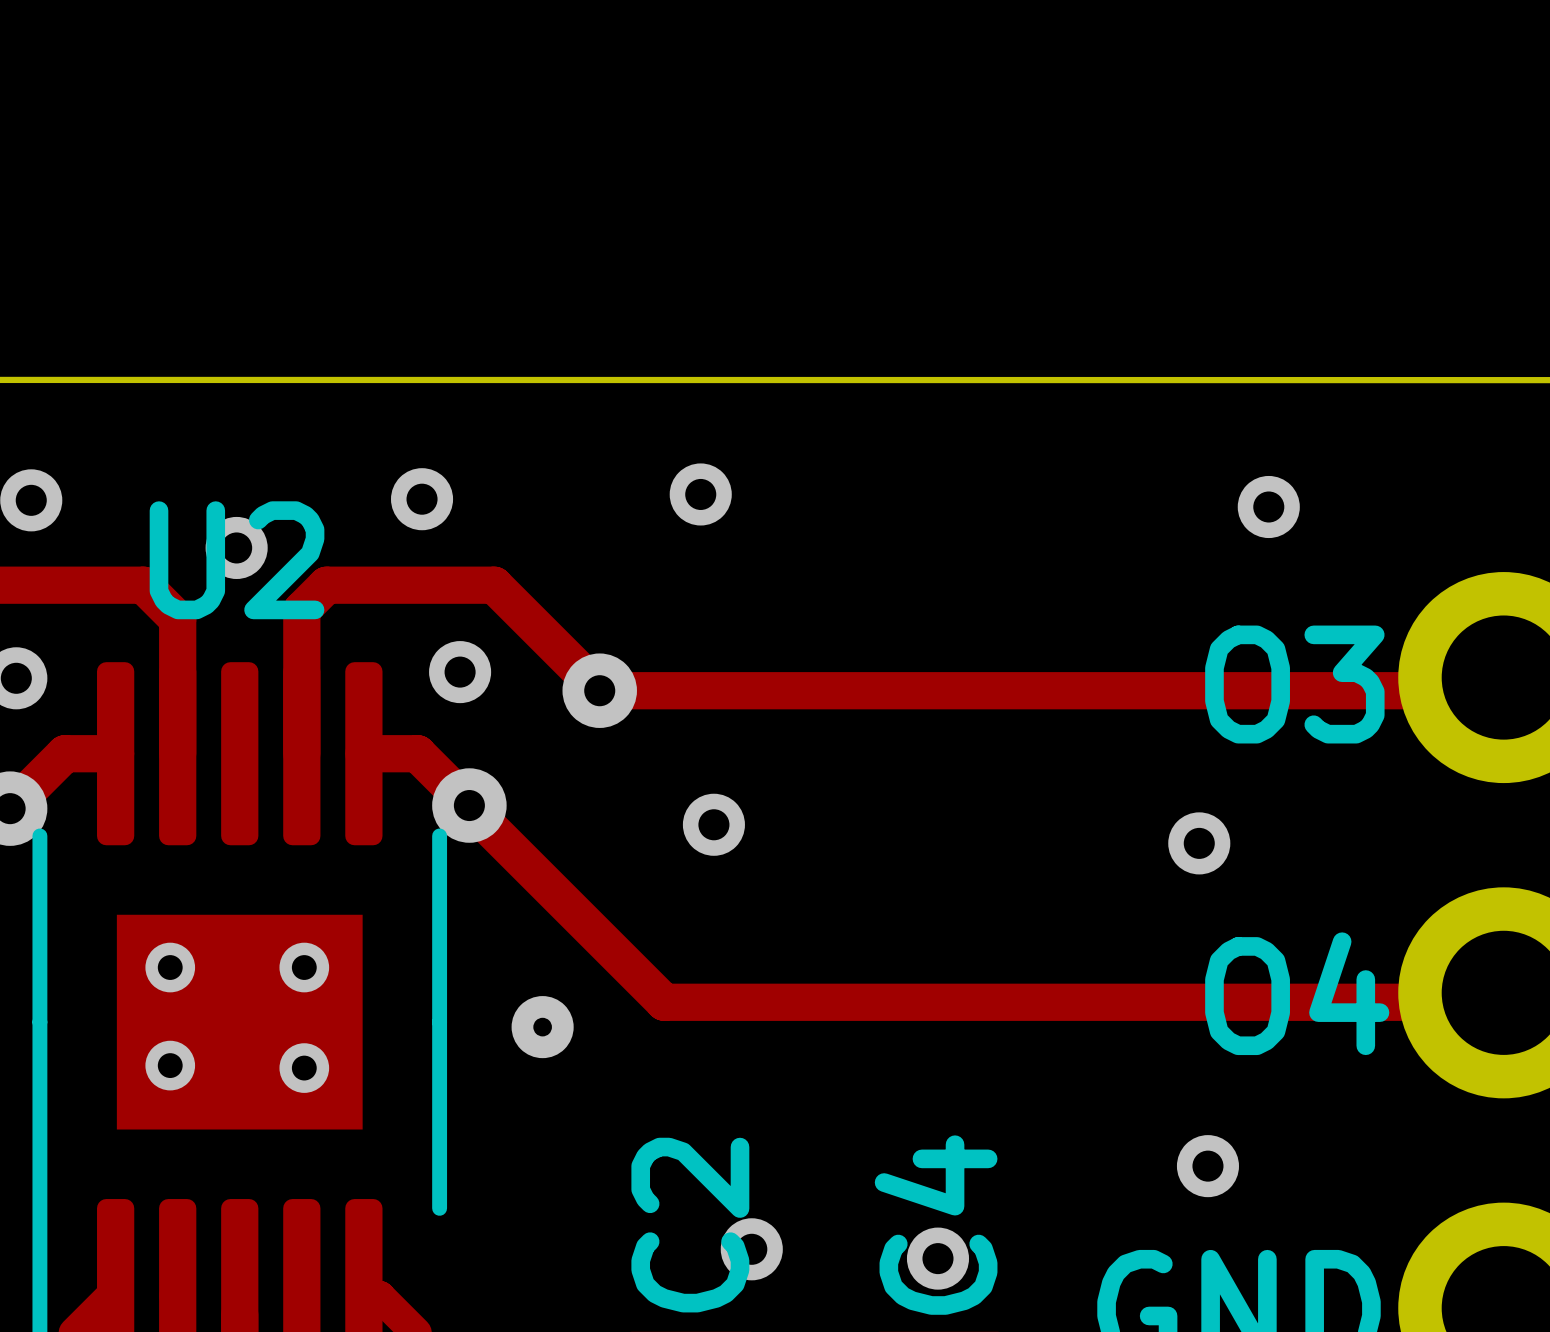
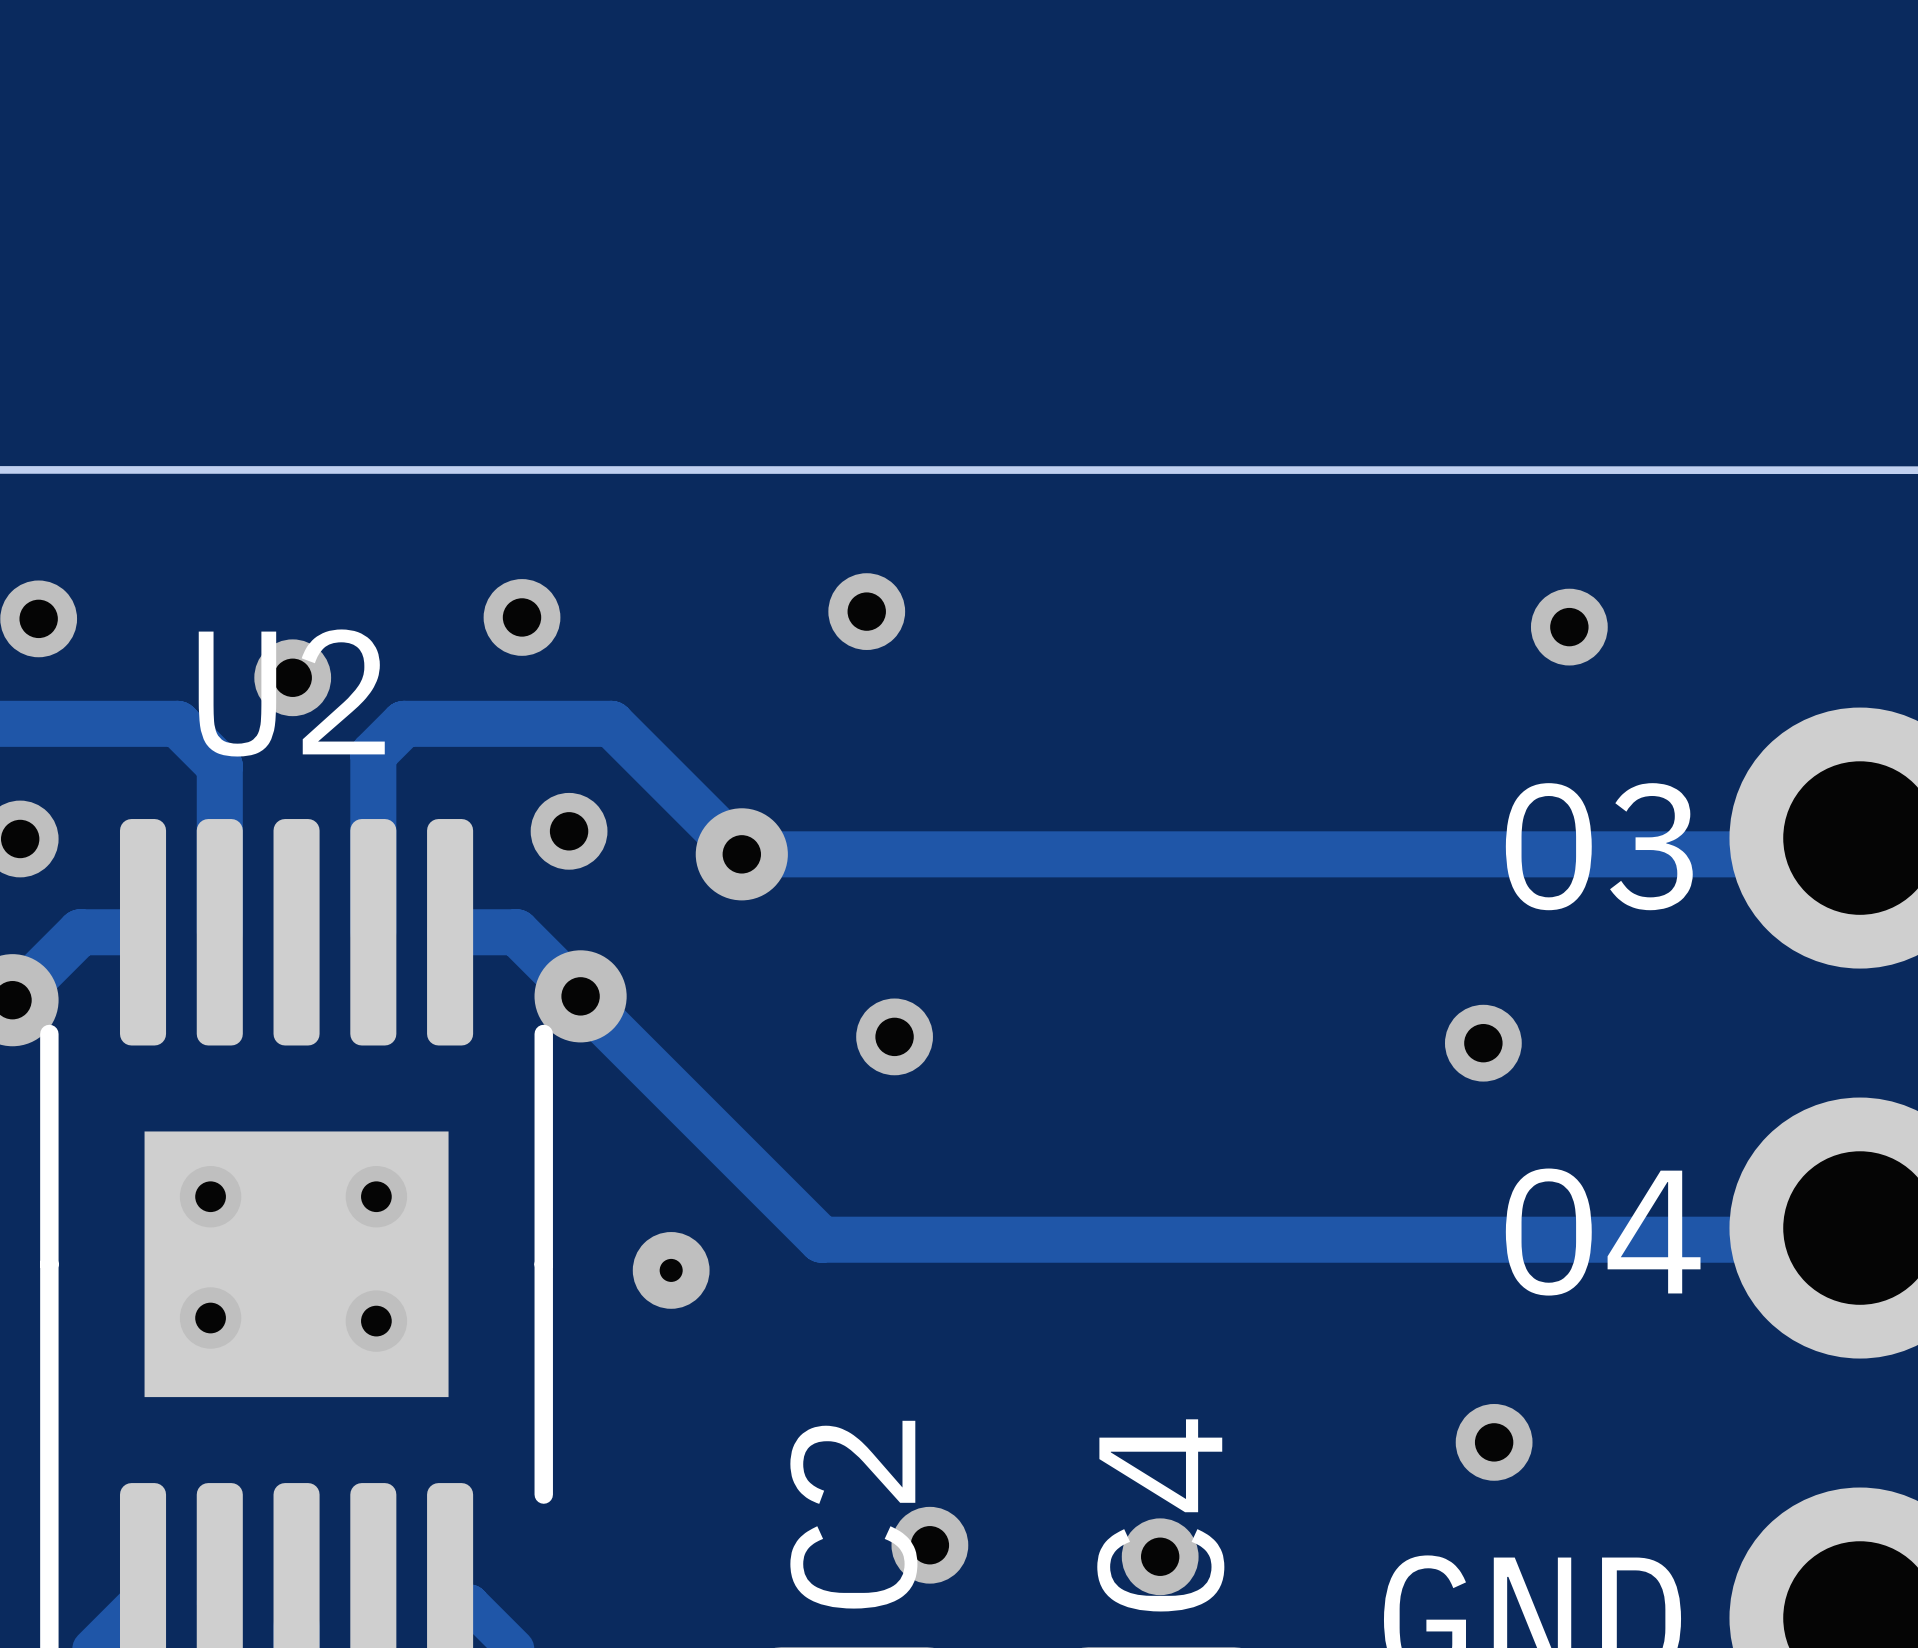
via position: (713, 824) -> (894, 1036)

